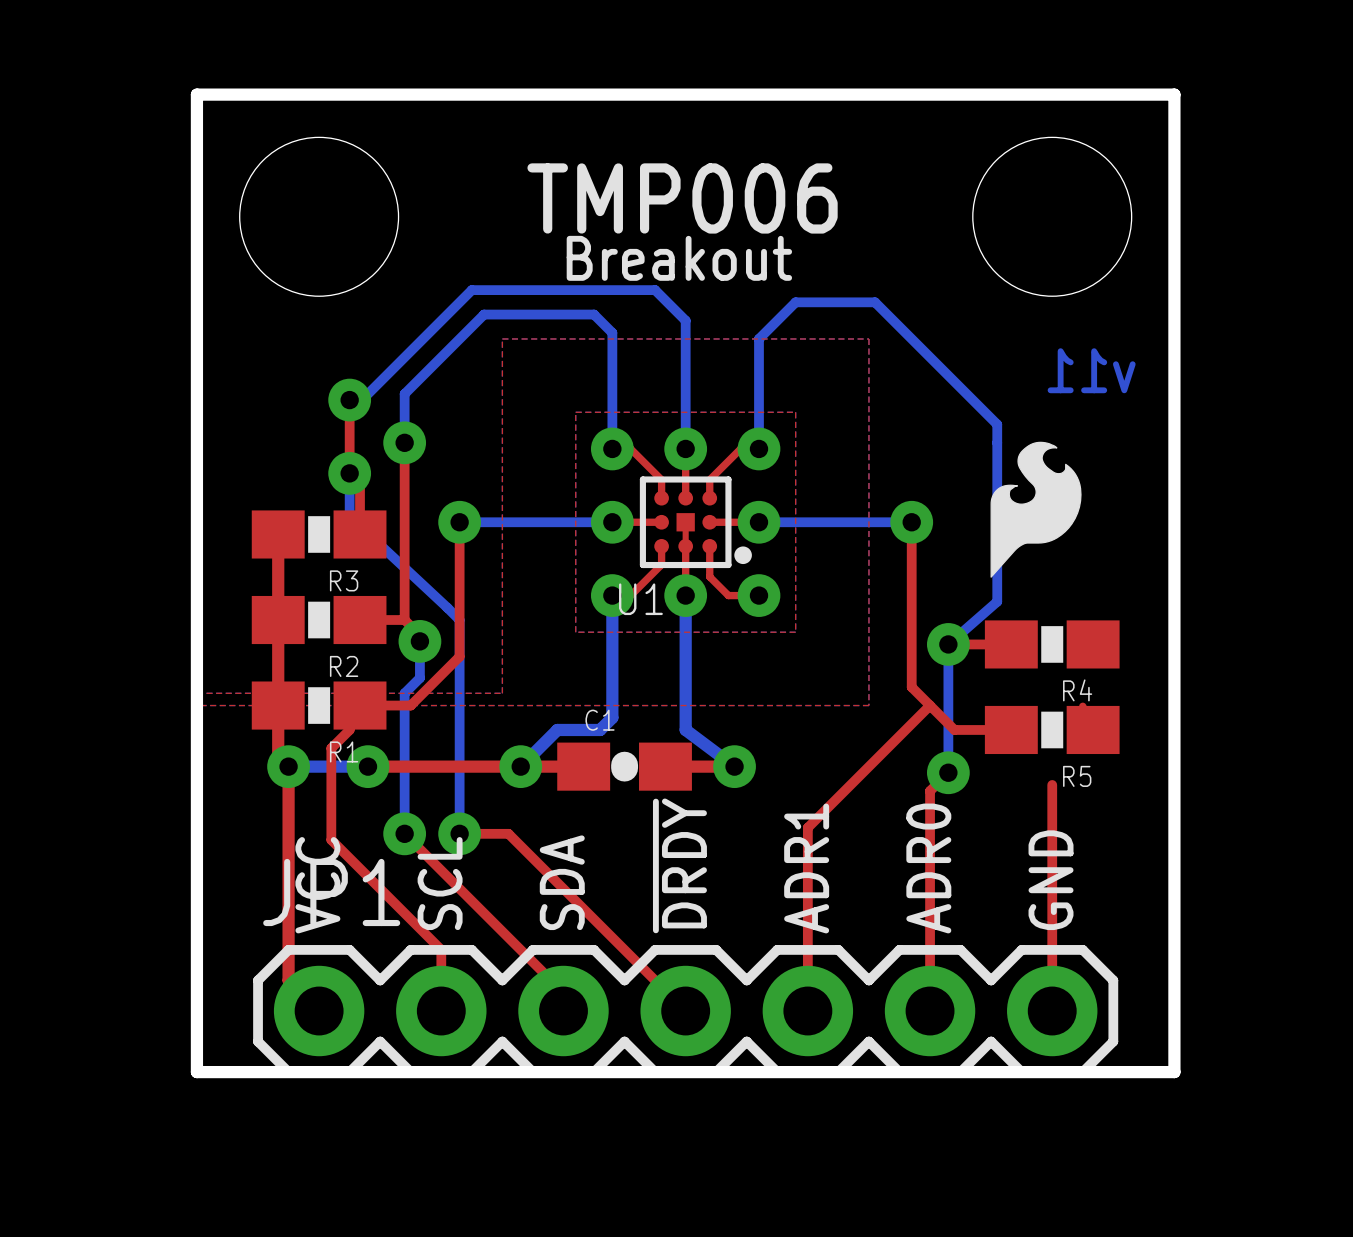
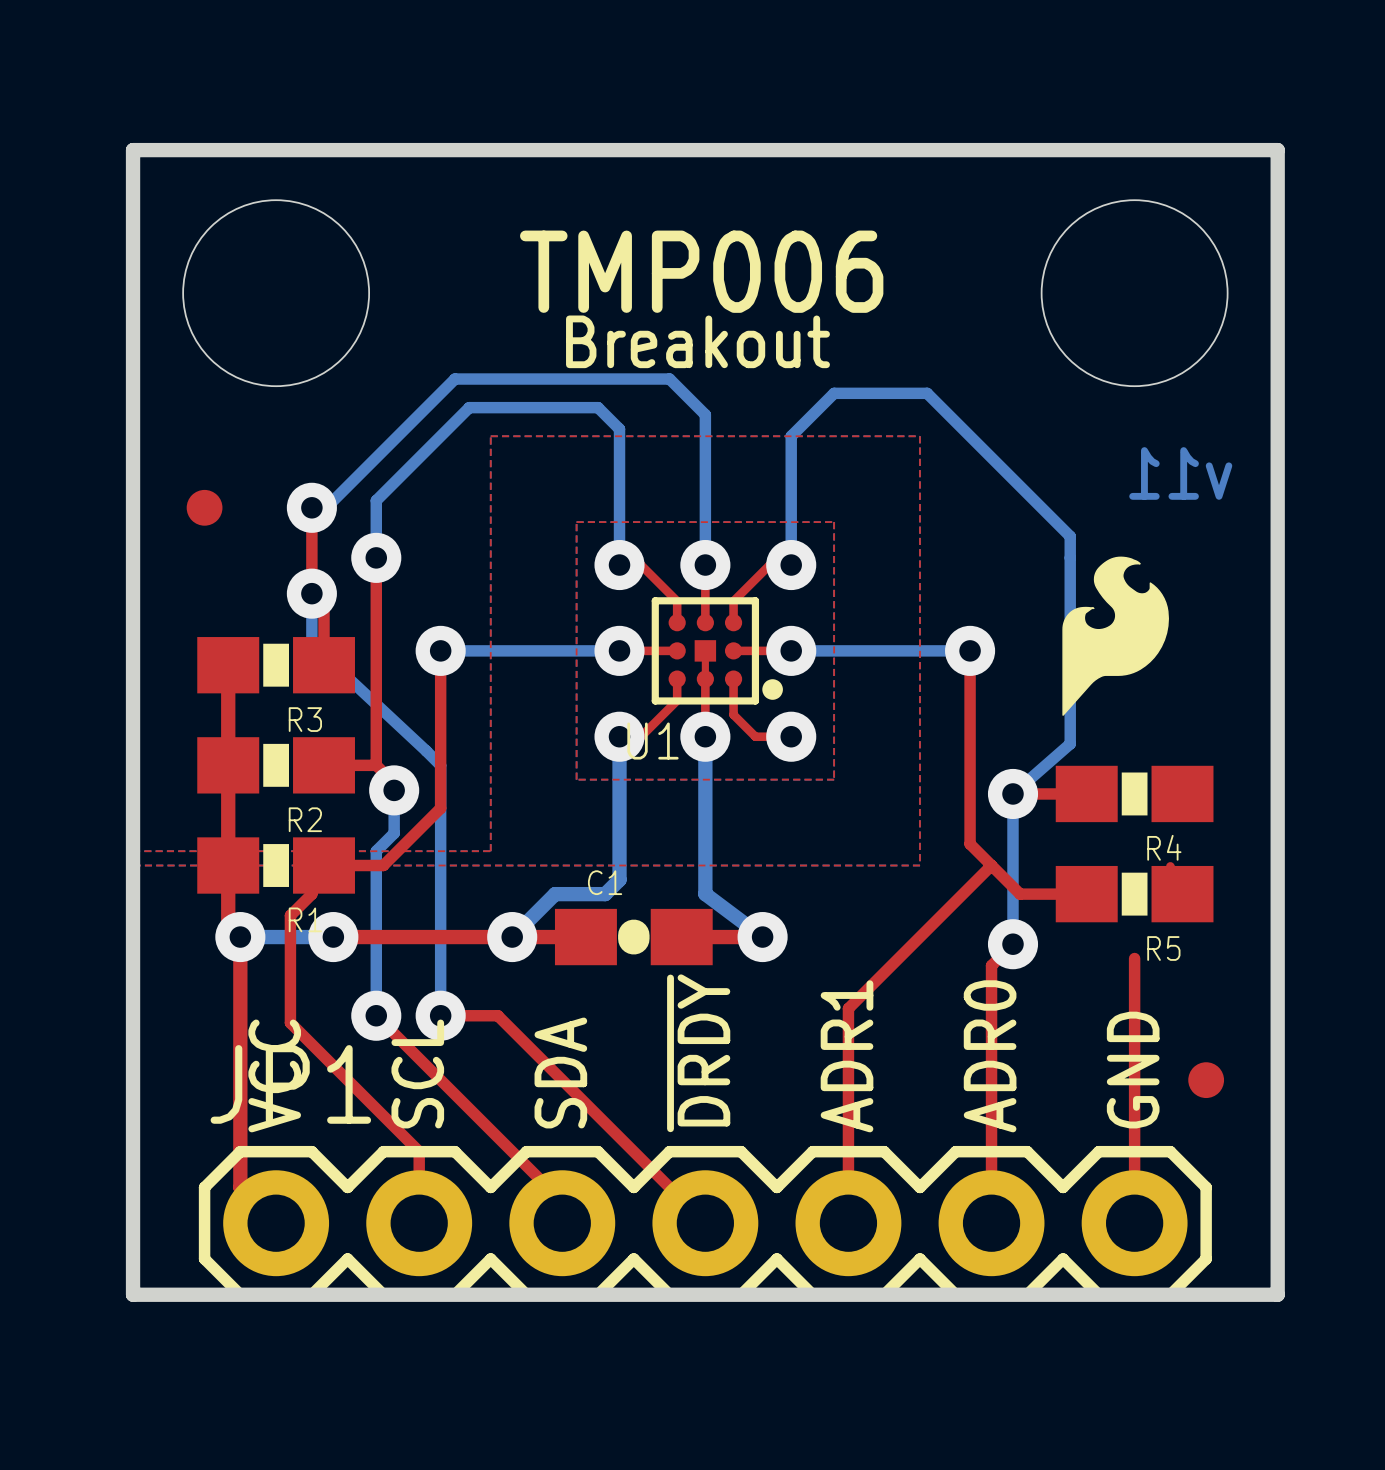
part: none -> (204, 507)
part: none -> (1206, 1080)

